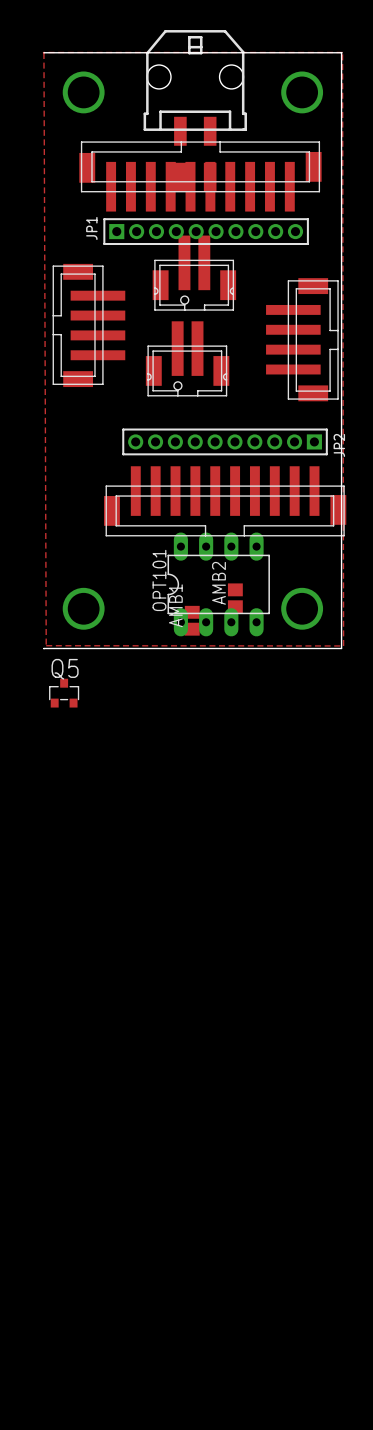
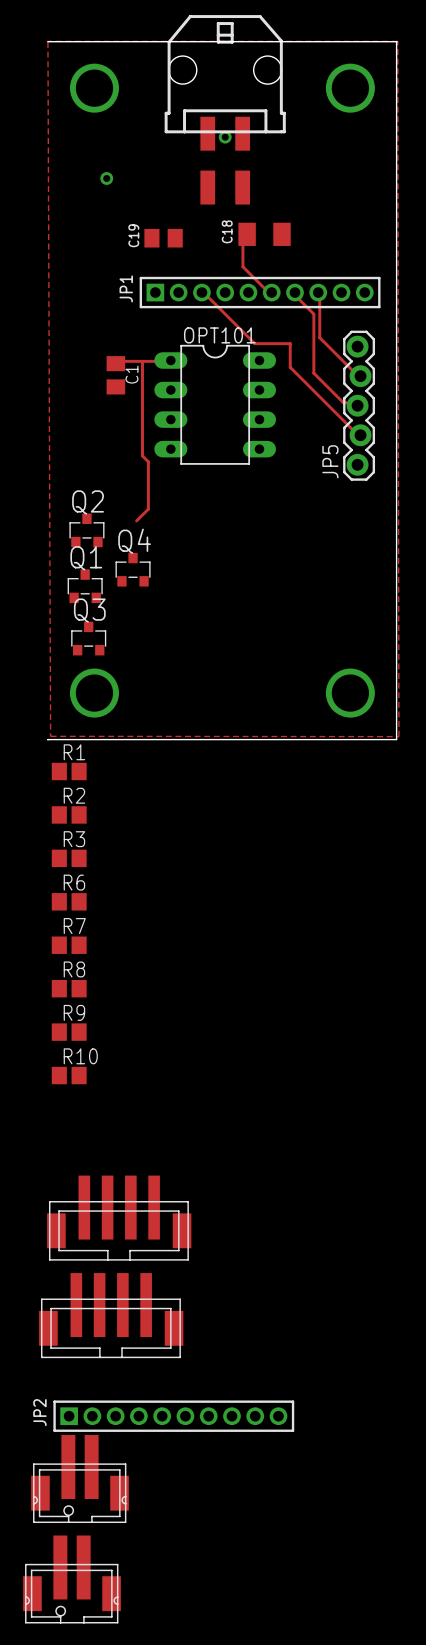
via: none -> (225, 137)
via: none -> (106, 178)
part: (200, 176) -> none
track: none -> (247, 234) (242, 237) (242, 266) (266, 290)
C18: none -> (264, 234)
C19: none -> (163, 238)
JP1 position: (206, 231) -> (260, 292)
track: none -> (201, 292) (254, 343) (290, 343) (290, 367) (355, 432) (360, 435)
track: none -> (294, 292) (296, 296) (313, 314) (313, 373) (343, 402) (355, 402) (357, 405)
track: none -> (318, 292) (319, 337) (360, 376)
part: (194, 273) -> none
track: none -> (170, 360) (118, 361) (115, 363)
part: (88, 325) -> none
track: none -> (142, 361) (142, 455) (148, 461) (148, 509) (136, 520)
C1: none -> (115, 375)
part: (302, 339) -> none
part: (187, 358) -> none
JP5: none -> (359, 405)
JP2 rotation: 0° (225, 441) -> 180° (173, 1416)
JP2 position: (225, 441) -> (173, 1416)
Q2: none -> (86, 530)
part: (225, 501) -> none
Q4: none -> (133, 569)
Q1: none -> (85, 586)
Q3: none -> (88, 638)
OPT101 rotation: 0° (218, 584) -> 90° clockwise (215, 404)
OPT101 position: (218, 584) -> (215, 404)
AMB2: (235, 598) -> none
AMB1: (192, 620) -> none
R1: none -> (69, 771)
Q5: (64, 693) -> none
R2: none -> (69, 814)
R3: none -> (69, 858)
R6: none -> (69, 901)
R7: none -> (69, 945)
R8: none -> (69, 988)
R9: none -> (69, 1032)
R10: none -> (69, 1075)
part: none -> (119, 1218)
part: none -> (111, 1315)
part: none -> (80, 1479)
part: none -> (72, 1579)

